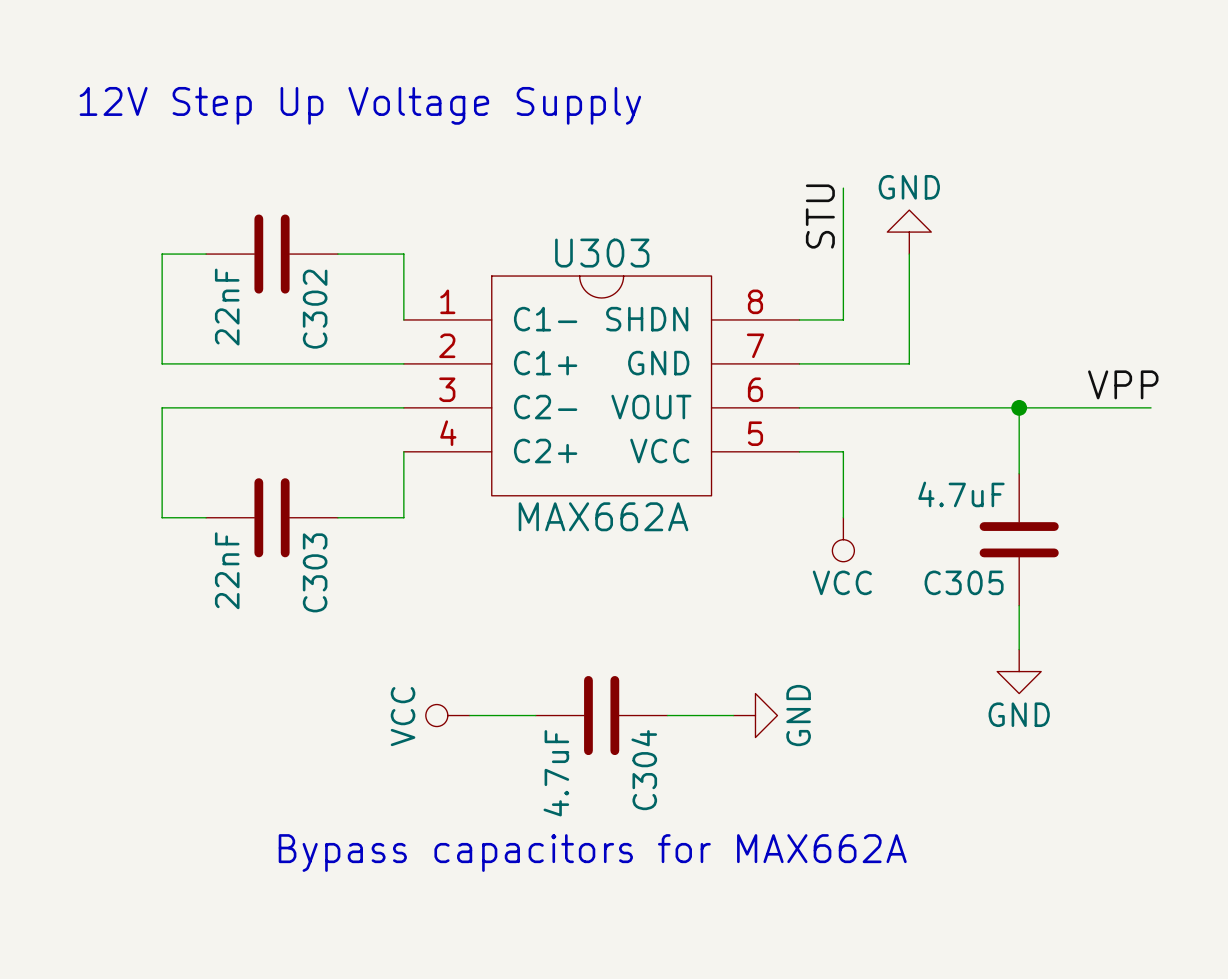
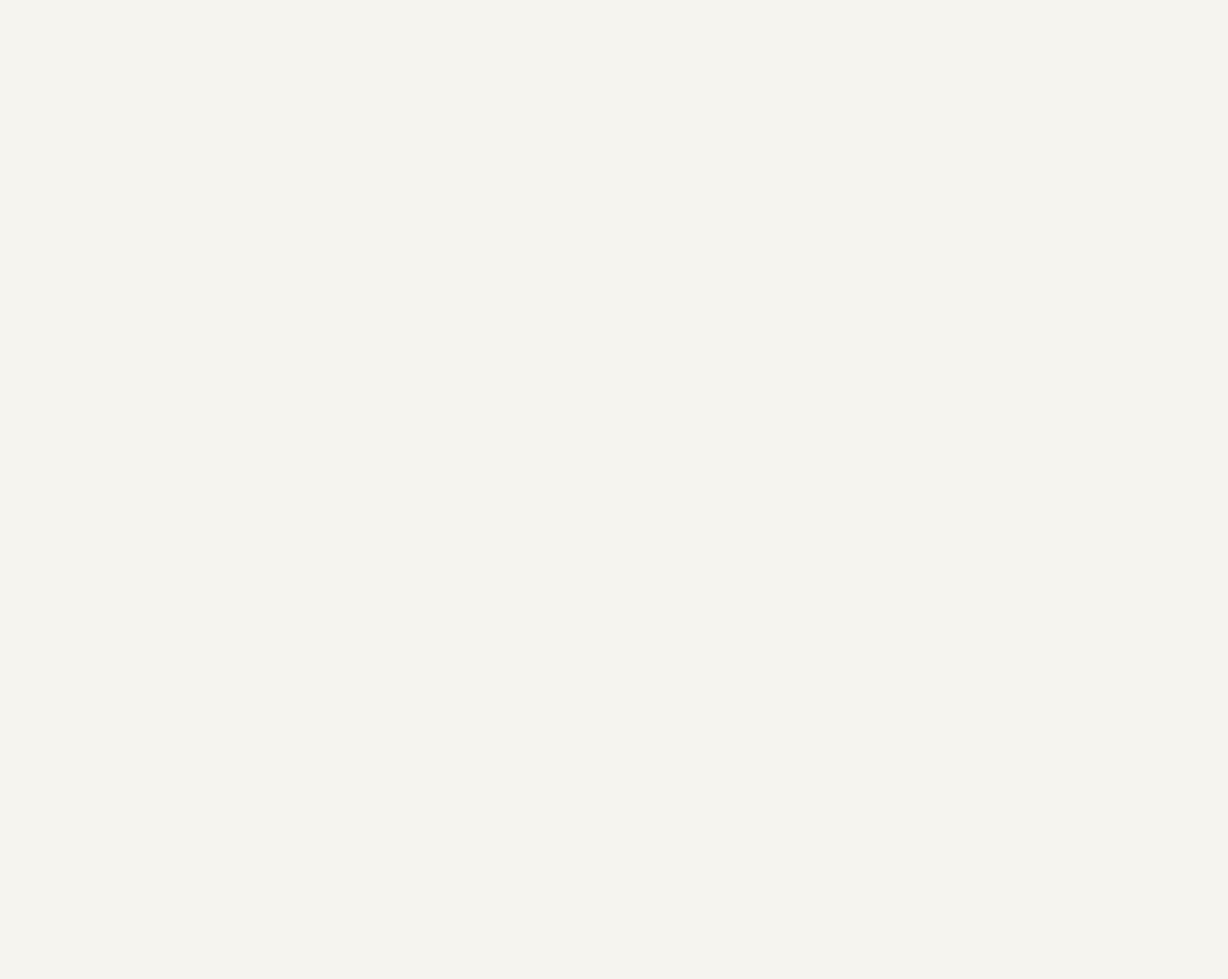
text: 12V Step Up Voltage Supply (360, 105) -> none
wire: (843, 188) (843, 319) (799, 319) -> none
label: STU (820, 216) -> none
power symbol: GND (909, 232) -> none
wire: (206, 254) (162, 254) (162, 363) (403, 363) -> none
C302: 22nF (272, 254) -> none
wire: (337, 254) (403, 254) (403, 319) -> none
wire: (909, 254) (909, 363) (799, 363) -> none
label: VPP (1123, 384) -> none
U303: MAX662A (601, 385) -> none
wire: (403, 407) (162, 407) (162, 517) (206, 517) -> none
wire: (799, 407) (1151, 407) -> none
wire: (1019, 407) (1019, 473) -> none
junction: (1019, 407) -> none
wire: (403, 451) (403, 517) (337, 517) -> none
wire: (799, 451) (843, 451) (843, 517) -> none
C303: 22nF (272, 517) -> none
power symbol: VCC (843, 539) -> none
C305: 4.7uF (1019, 539) -> none
wire: (1019, 605) (1019, 649) -> none
power symbol: GND (1019, 671) -> none
power symbol: VCC (447, 715) -> none
wire: (469, 715) (535, 715) -> none
C304: 4.7uF (601, 715) -> none
wire: (667, 715) (733, 715) -> none
power symbol: GND (755, 715) -> none
text: Bypass capacitors for MAX662A (592, 853) -> none

